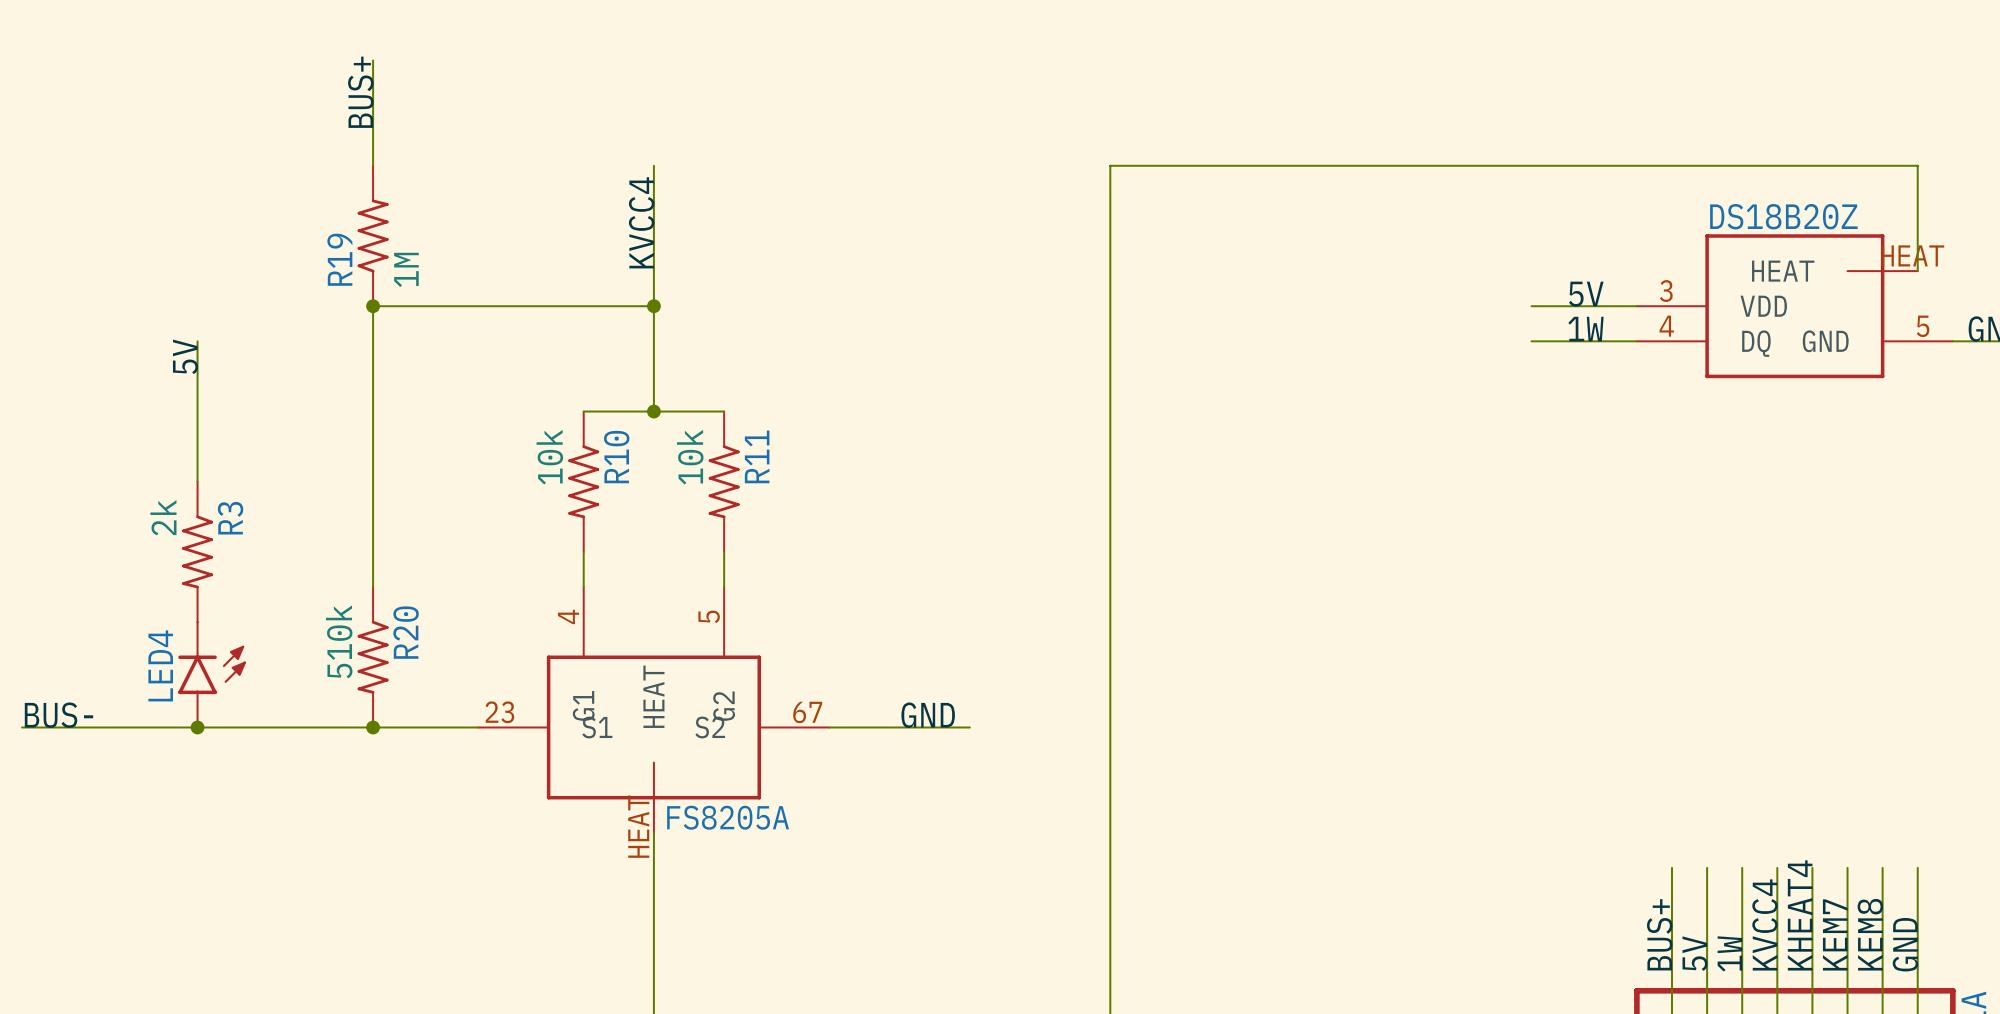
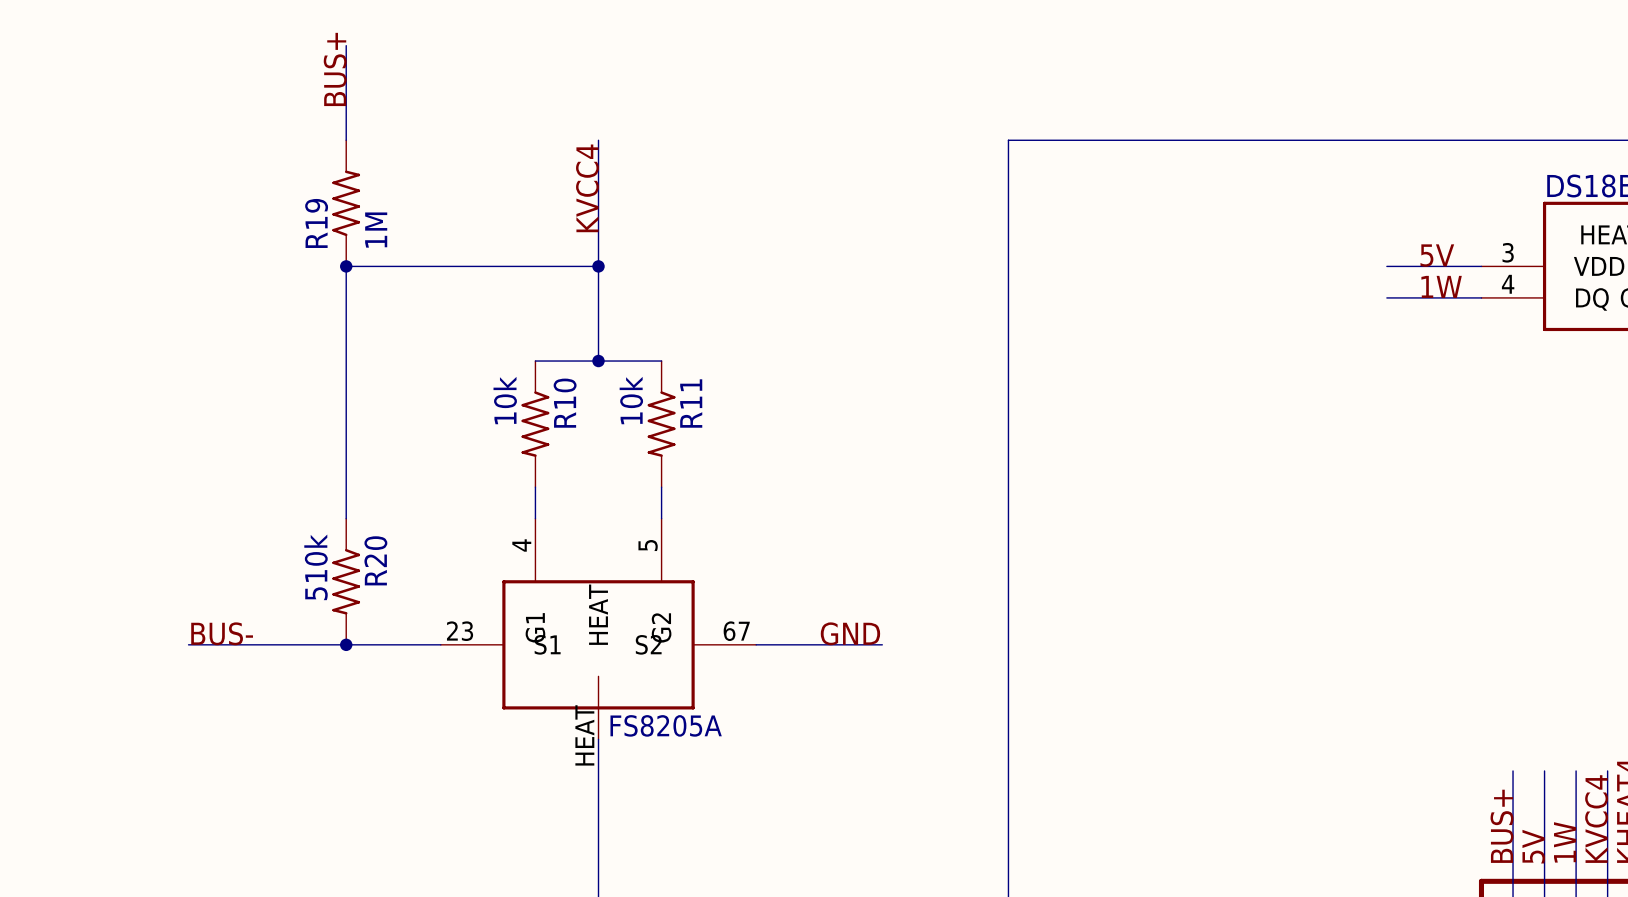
wire: (197, 341) (197, 481) -> none
label: 5V (185, 356) -> none
R3: 2k (197, 551) -> none
LED4: (212, 674) -> none
label position: BUS- (58, 715) -> BUS- (222, 633)
wire: (22, 727) (197, 727) -> none
junction: (197, 727) -> none

